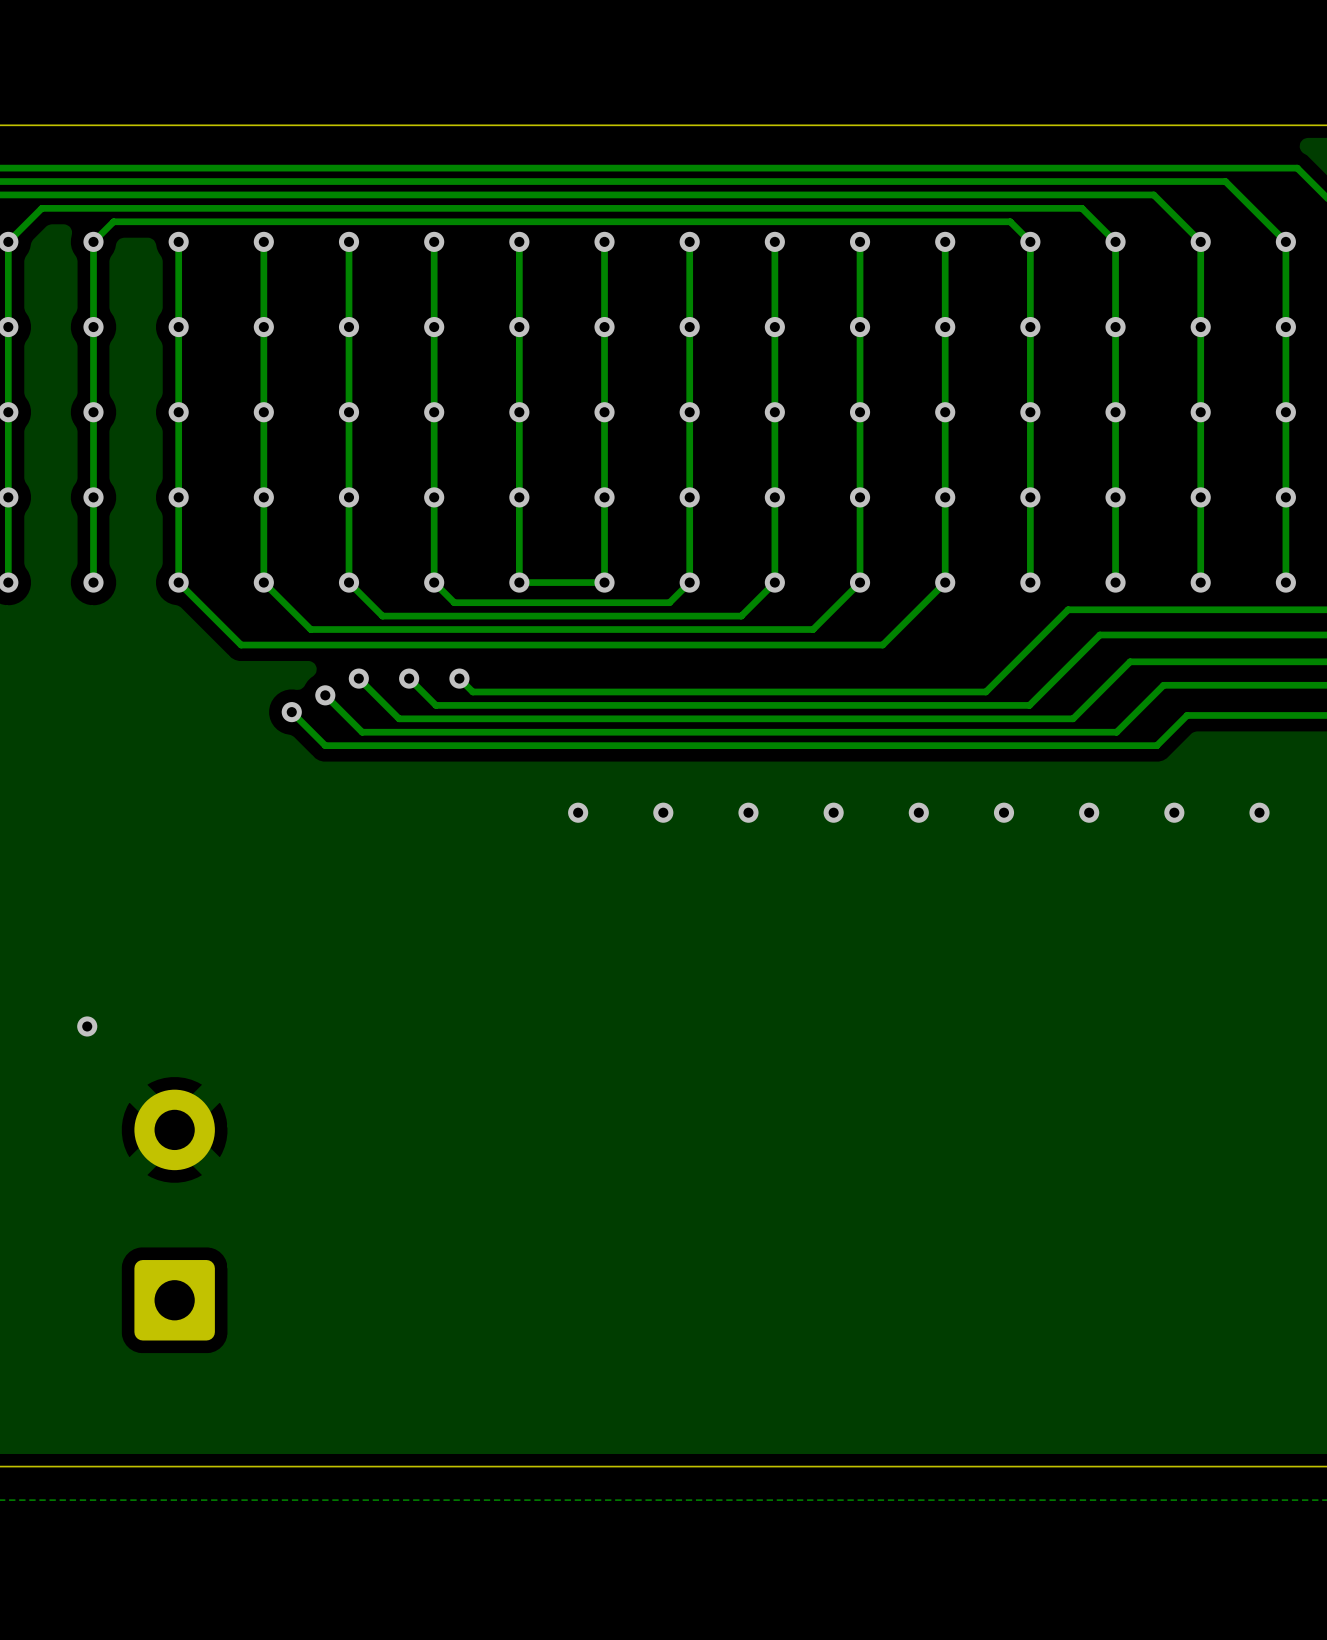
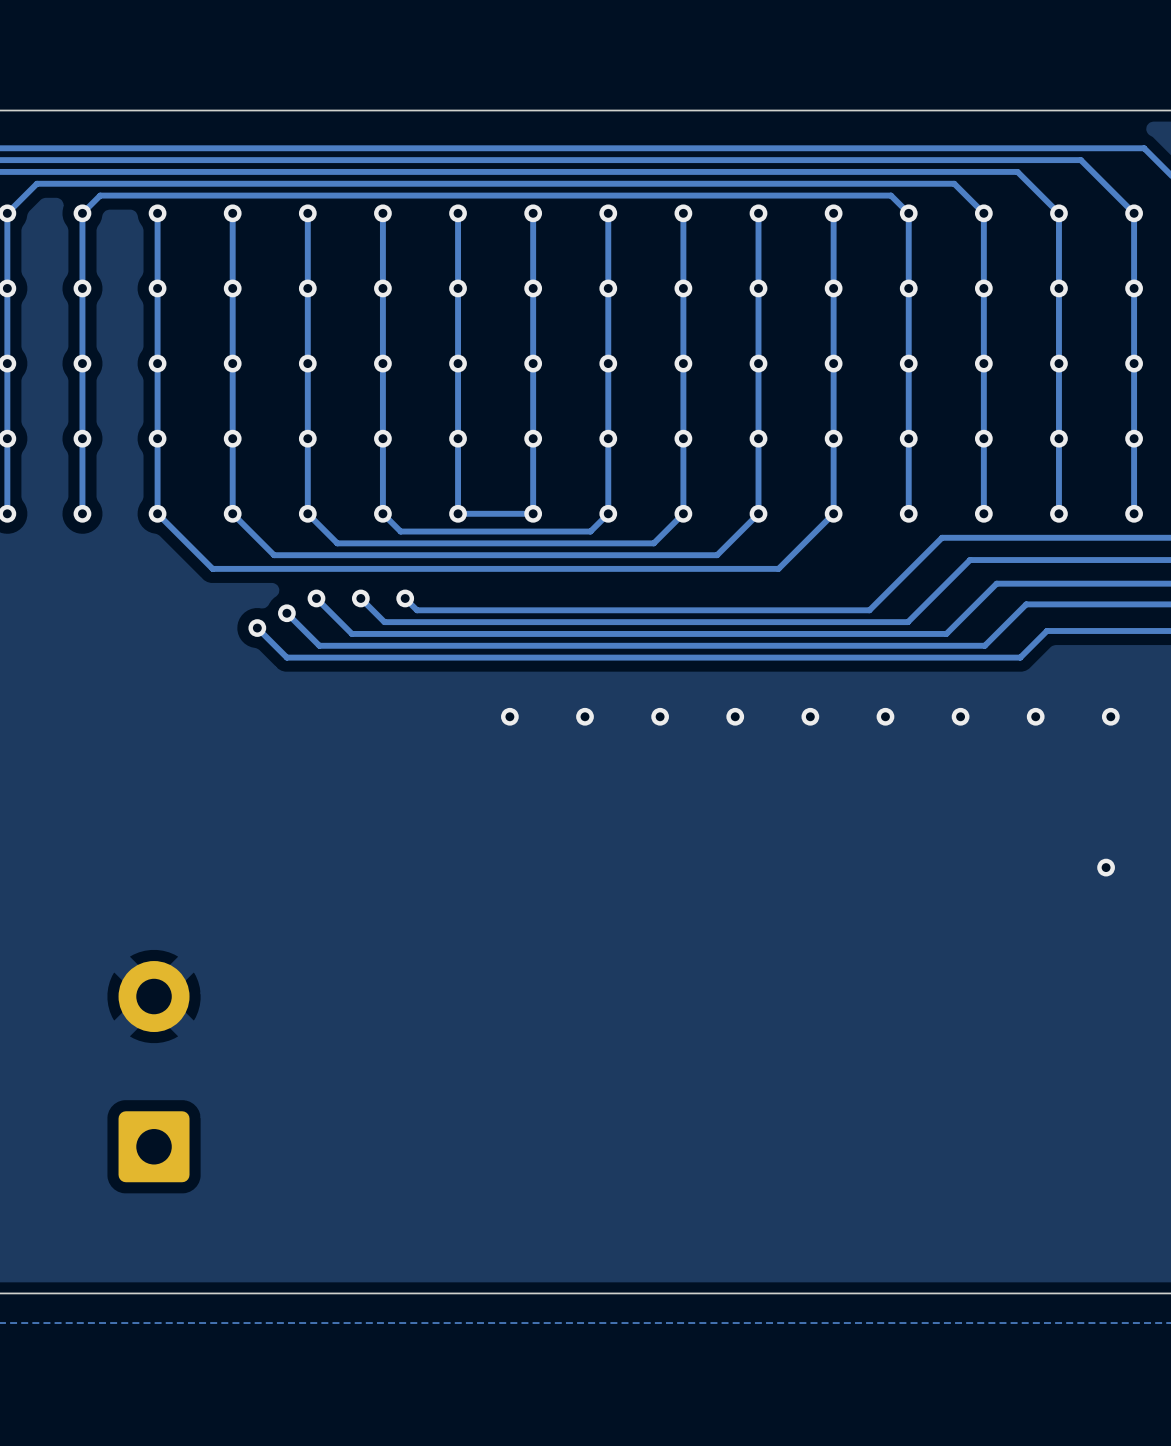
via: none -> (1106, 867)
via: (87, 1026) -> none

